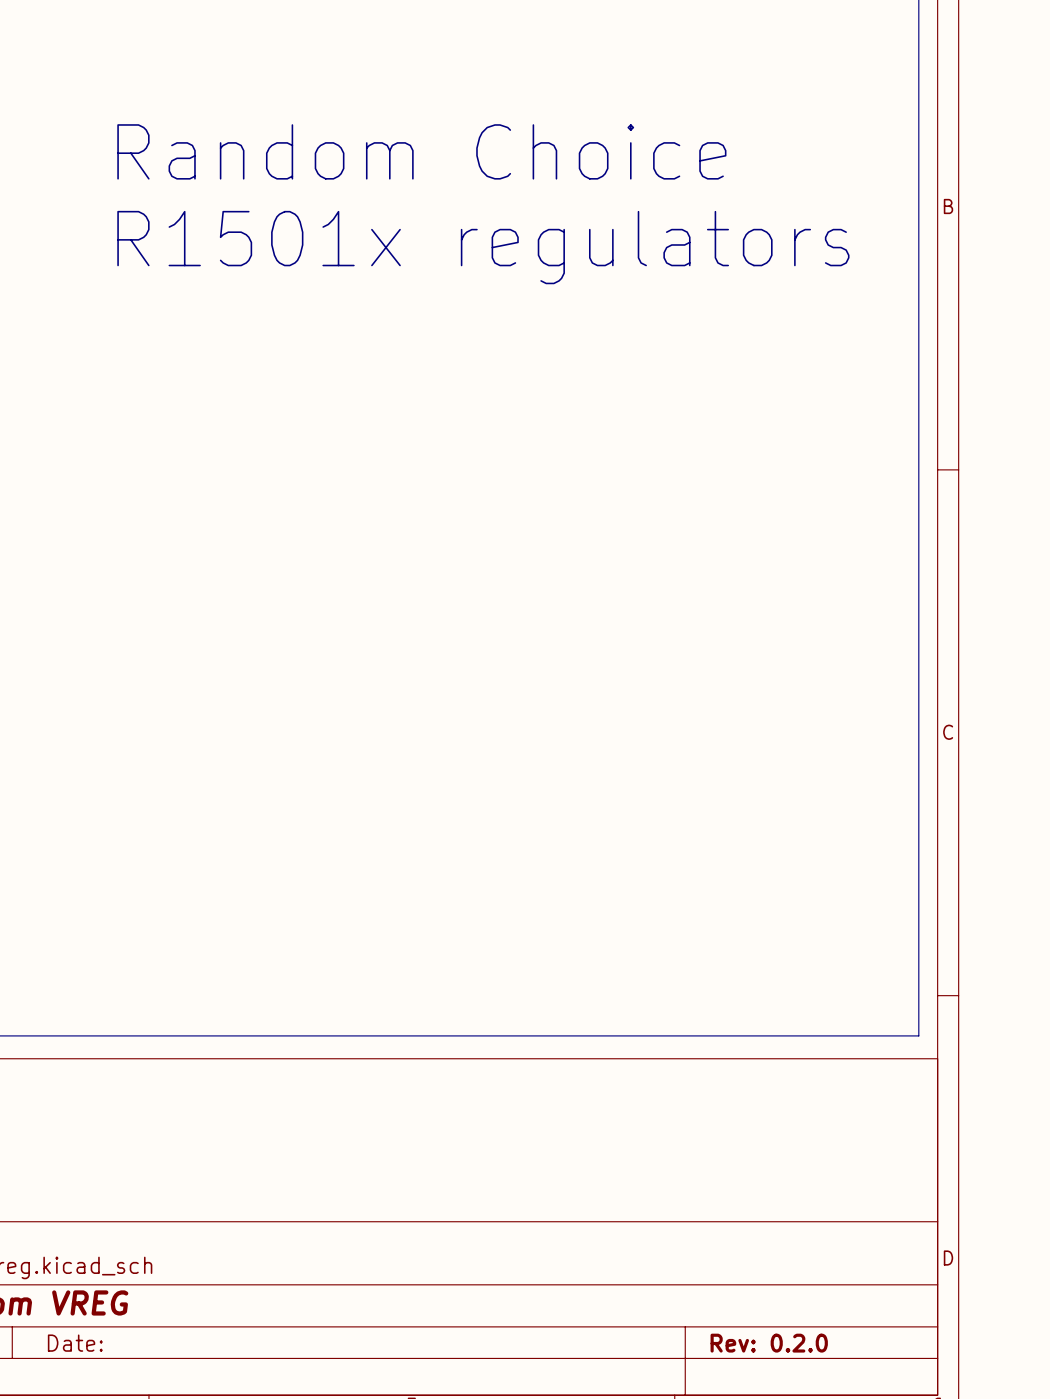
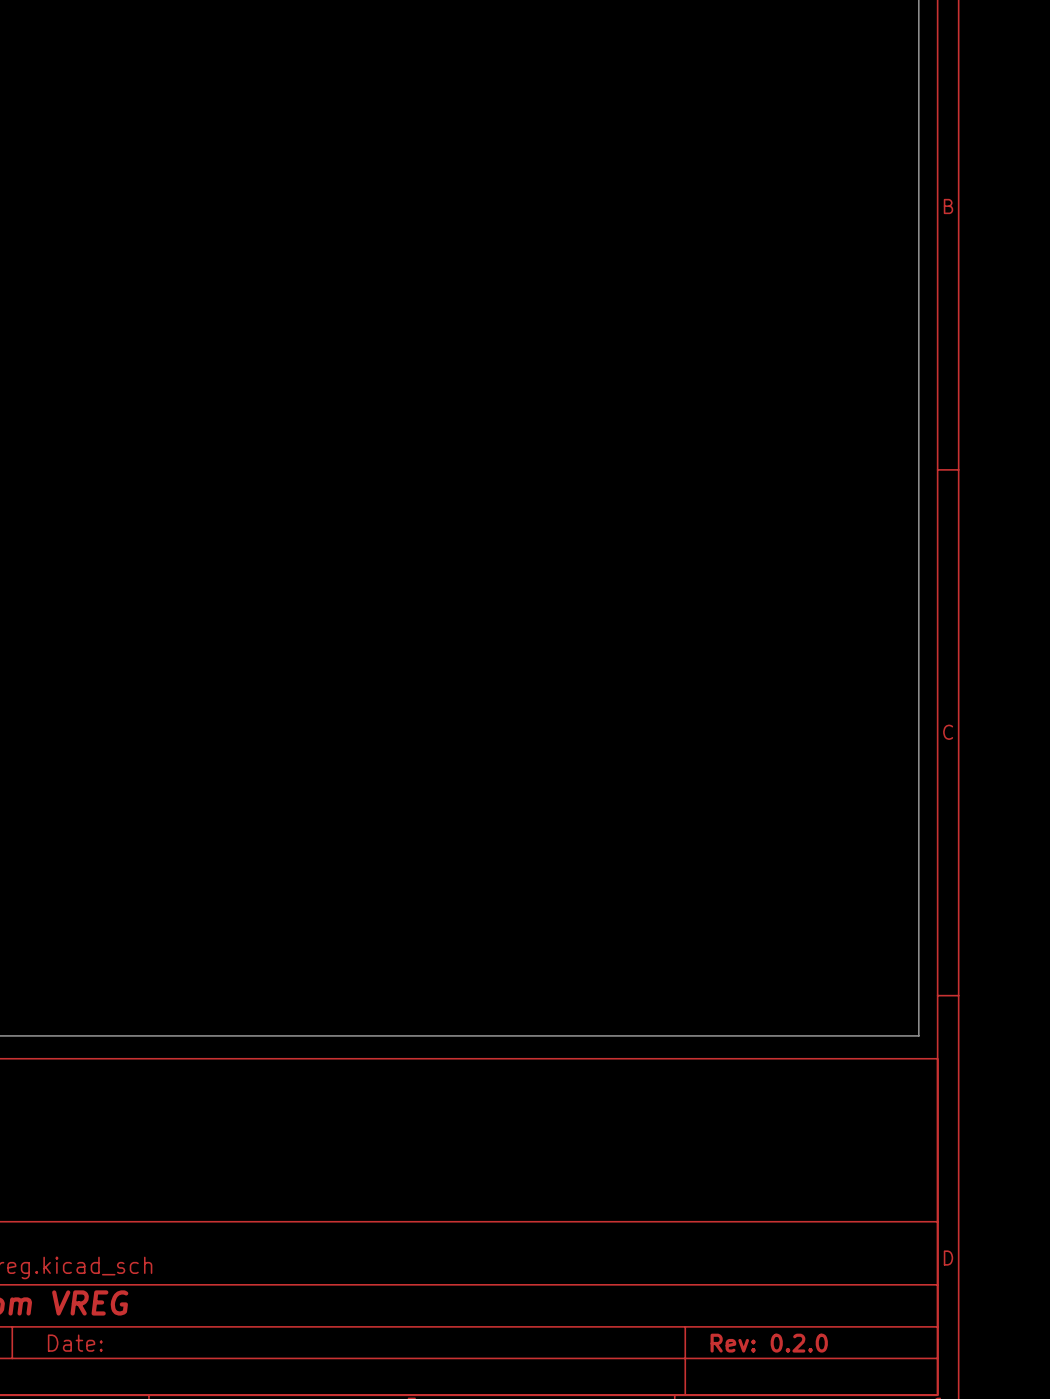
text: Random Choice (421, 151) -> none
text: R1501x regulators (483, 247) -> none

